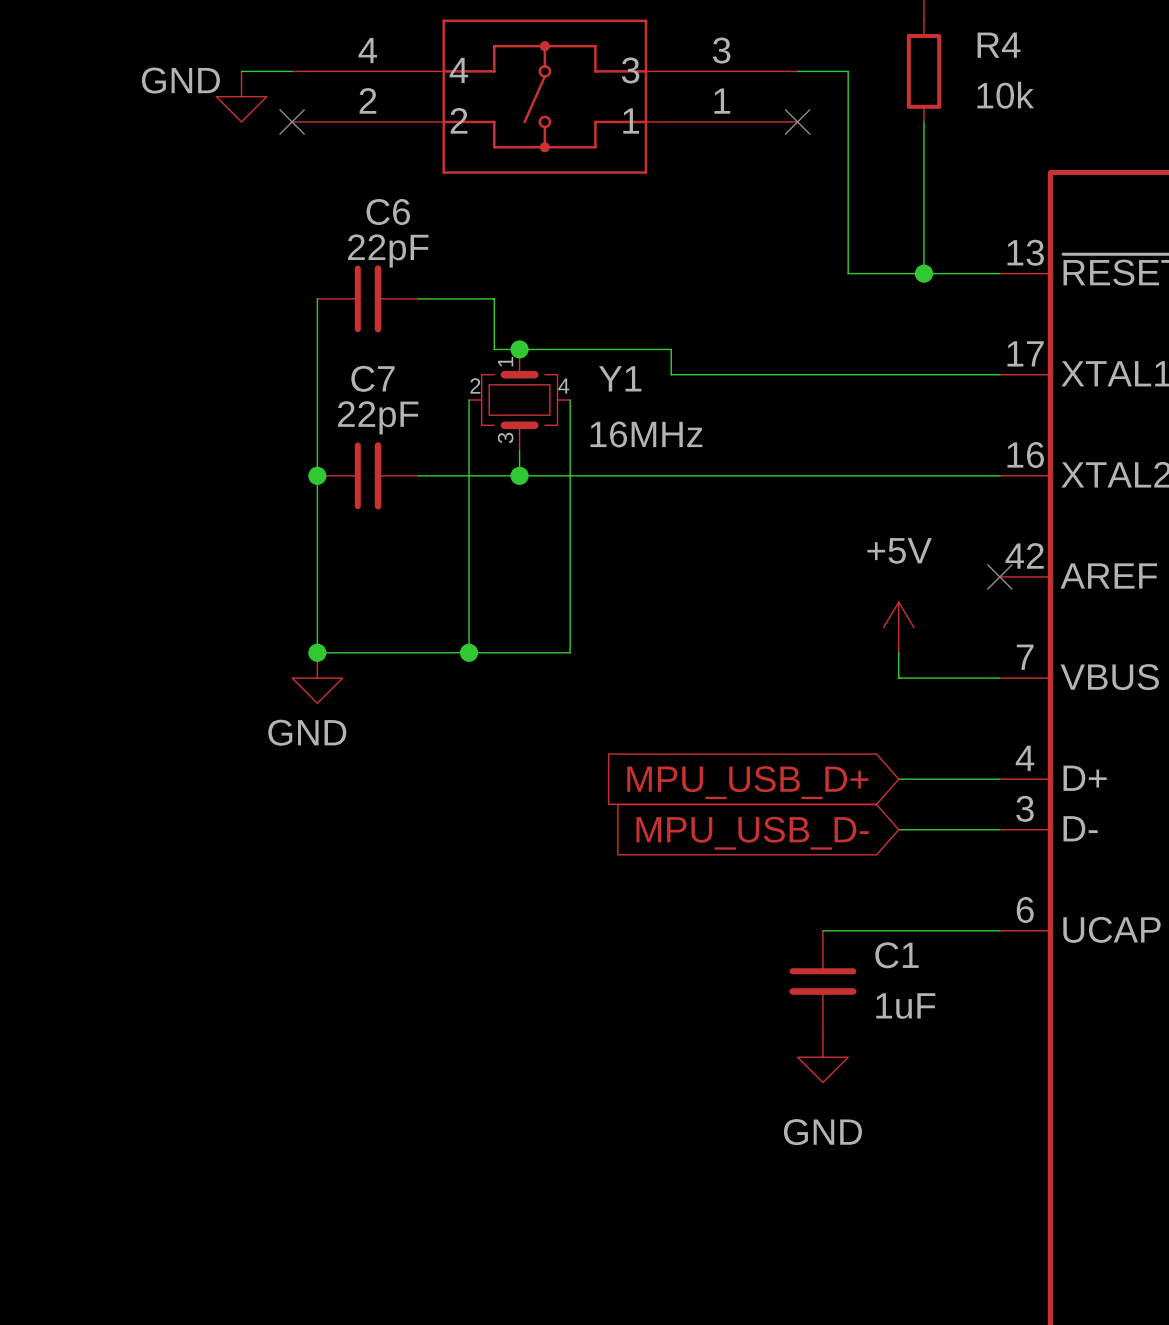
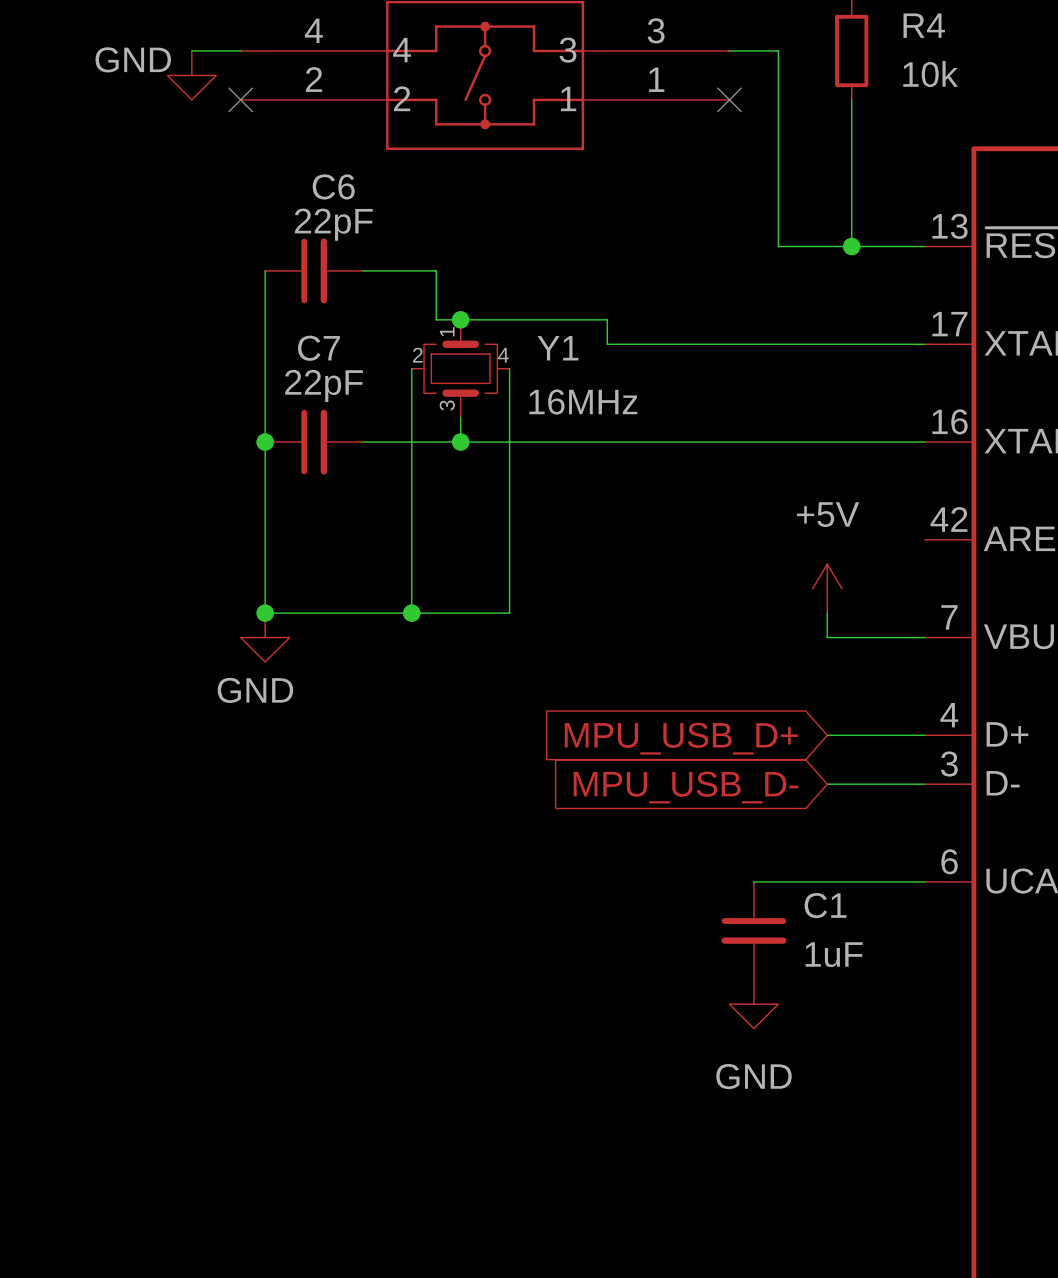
no-connect mark: (999, 576) -> none

